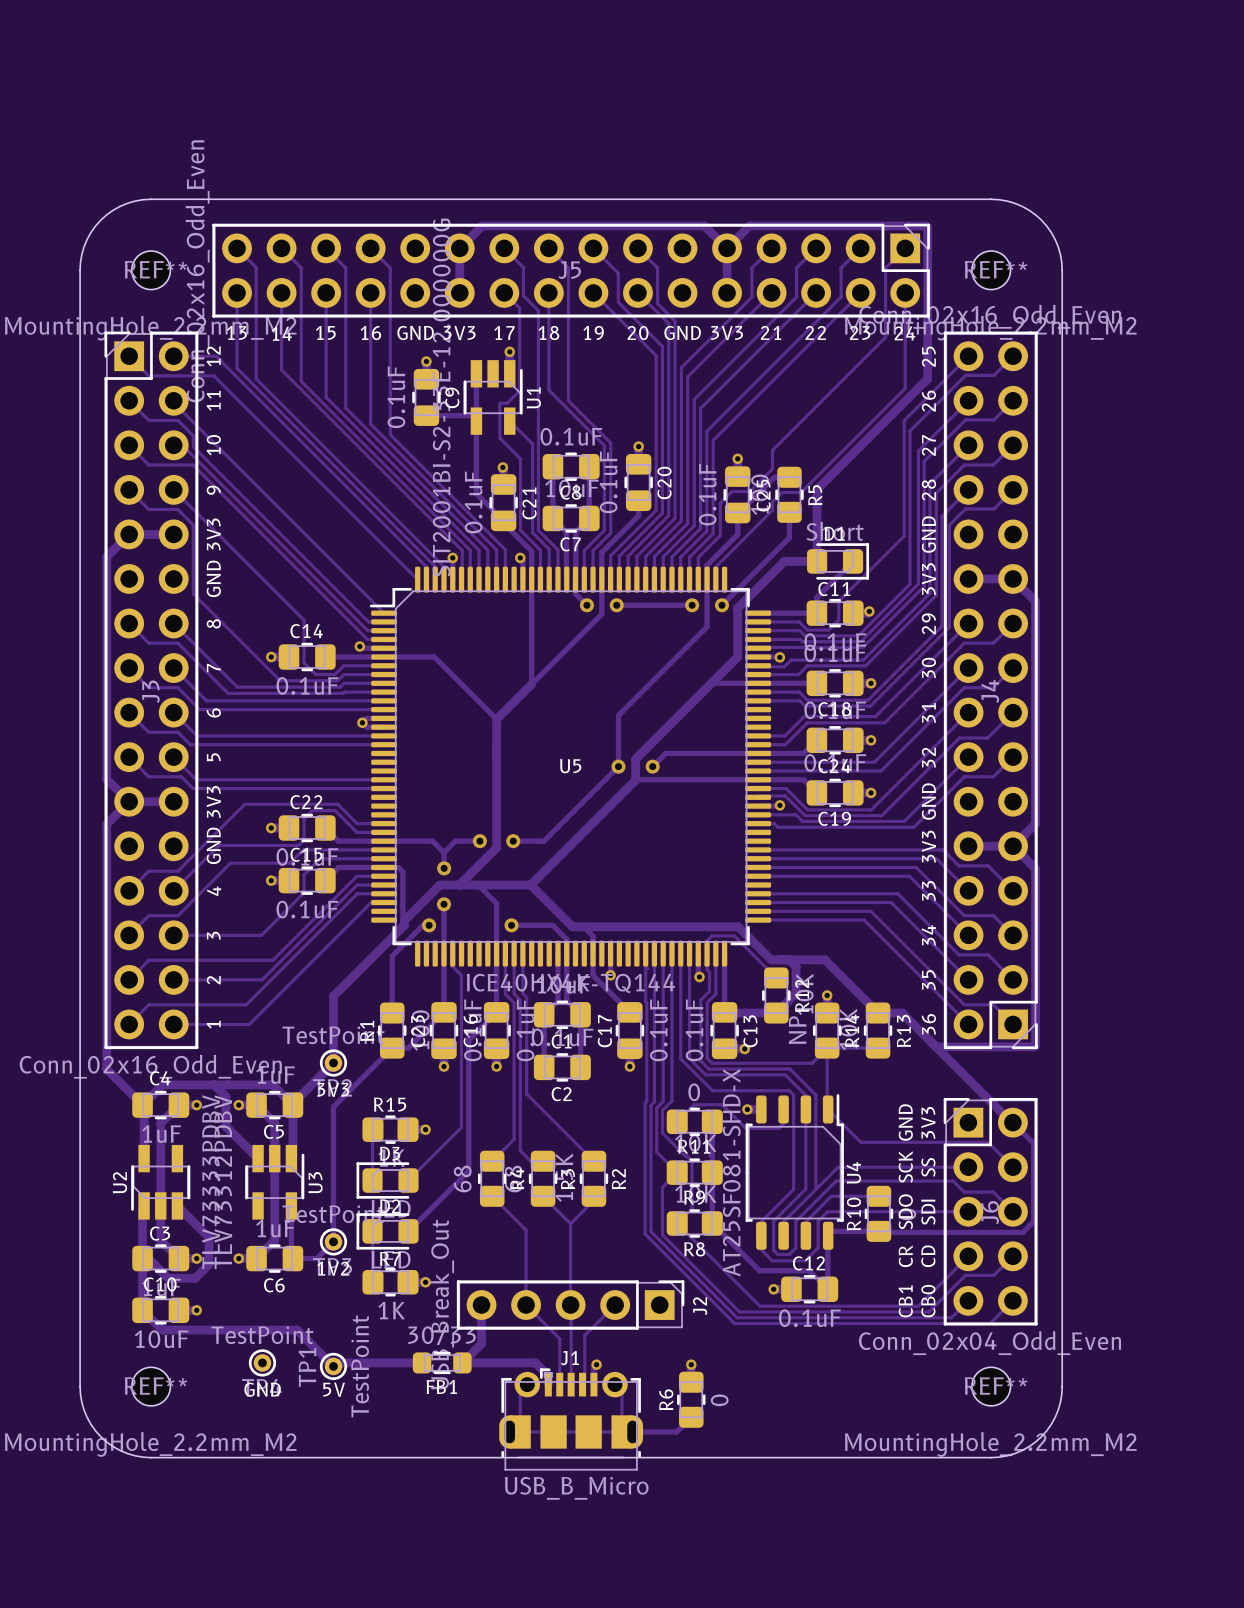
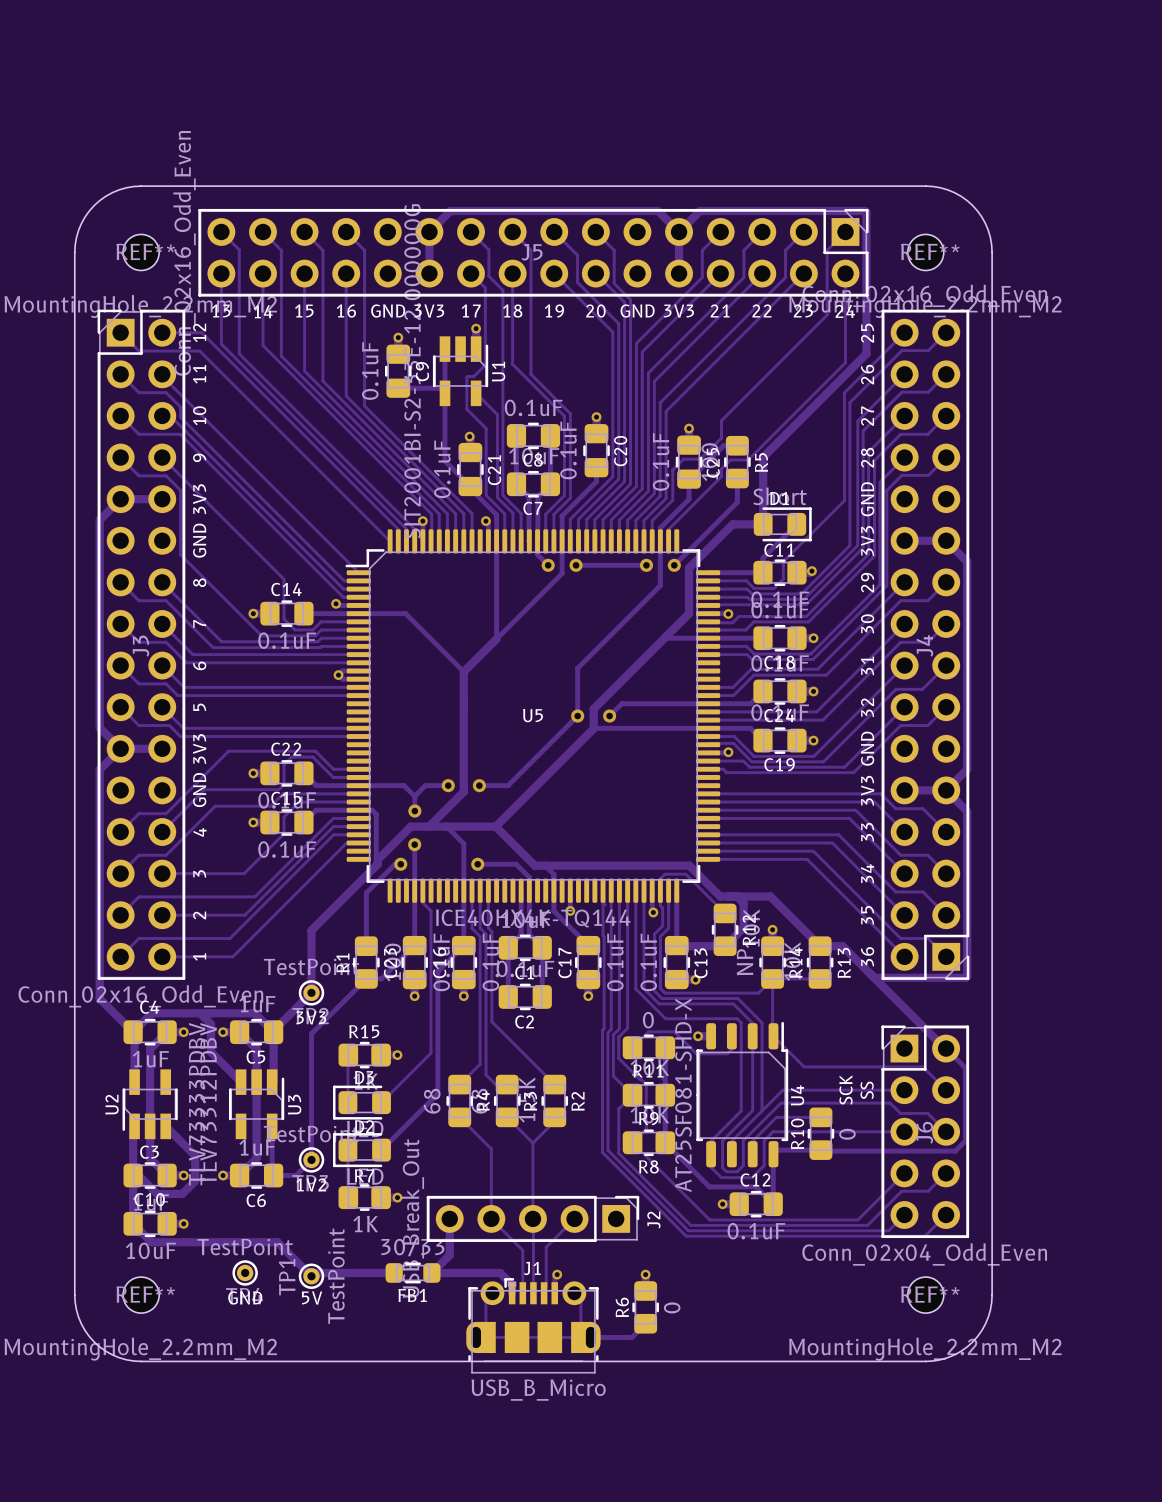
text: GND (905, 1122) -> none
text: 3V3 (928, 1122) -> none
text: SDO (905, 1211) -> none
text: SDI (928, 1212) -> none
text: CR (905, 1256) -> none
text: CD (928, 1256) -> none
text: CB1 (905, 1301) -> none
text: CB0 (928, 1301) -> none

